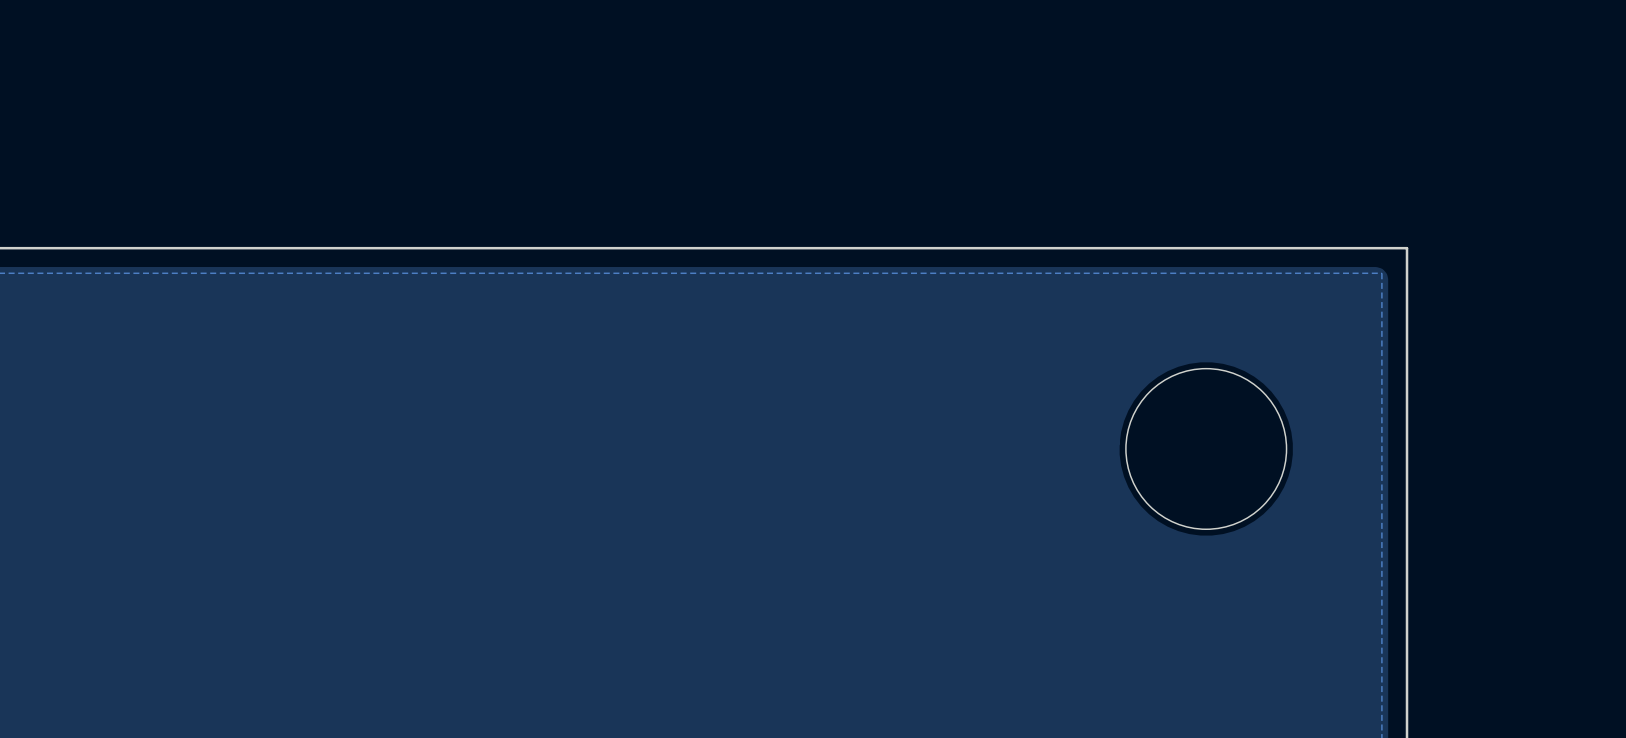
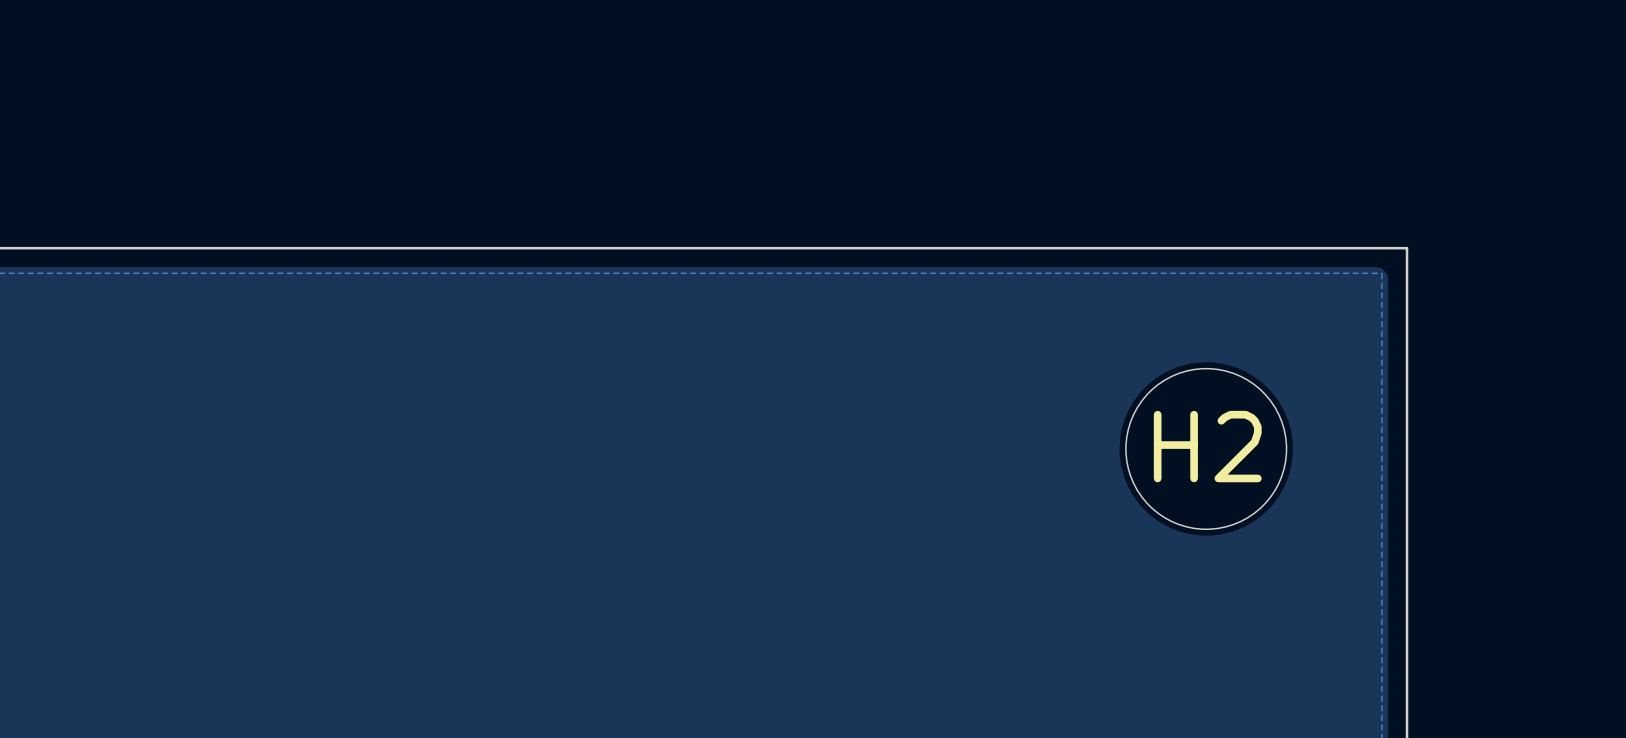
H2 name: none -> H2 (1207, 446)

